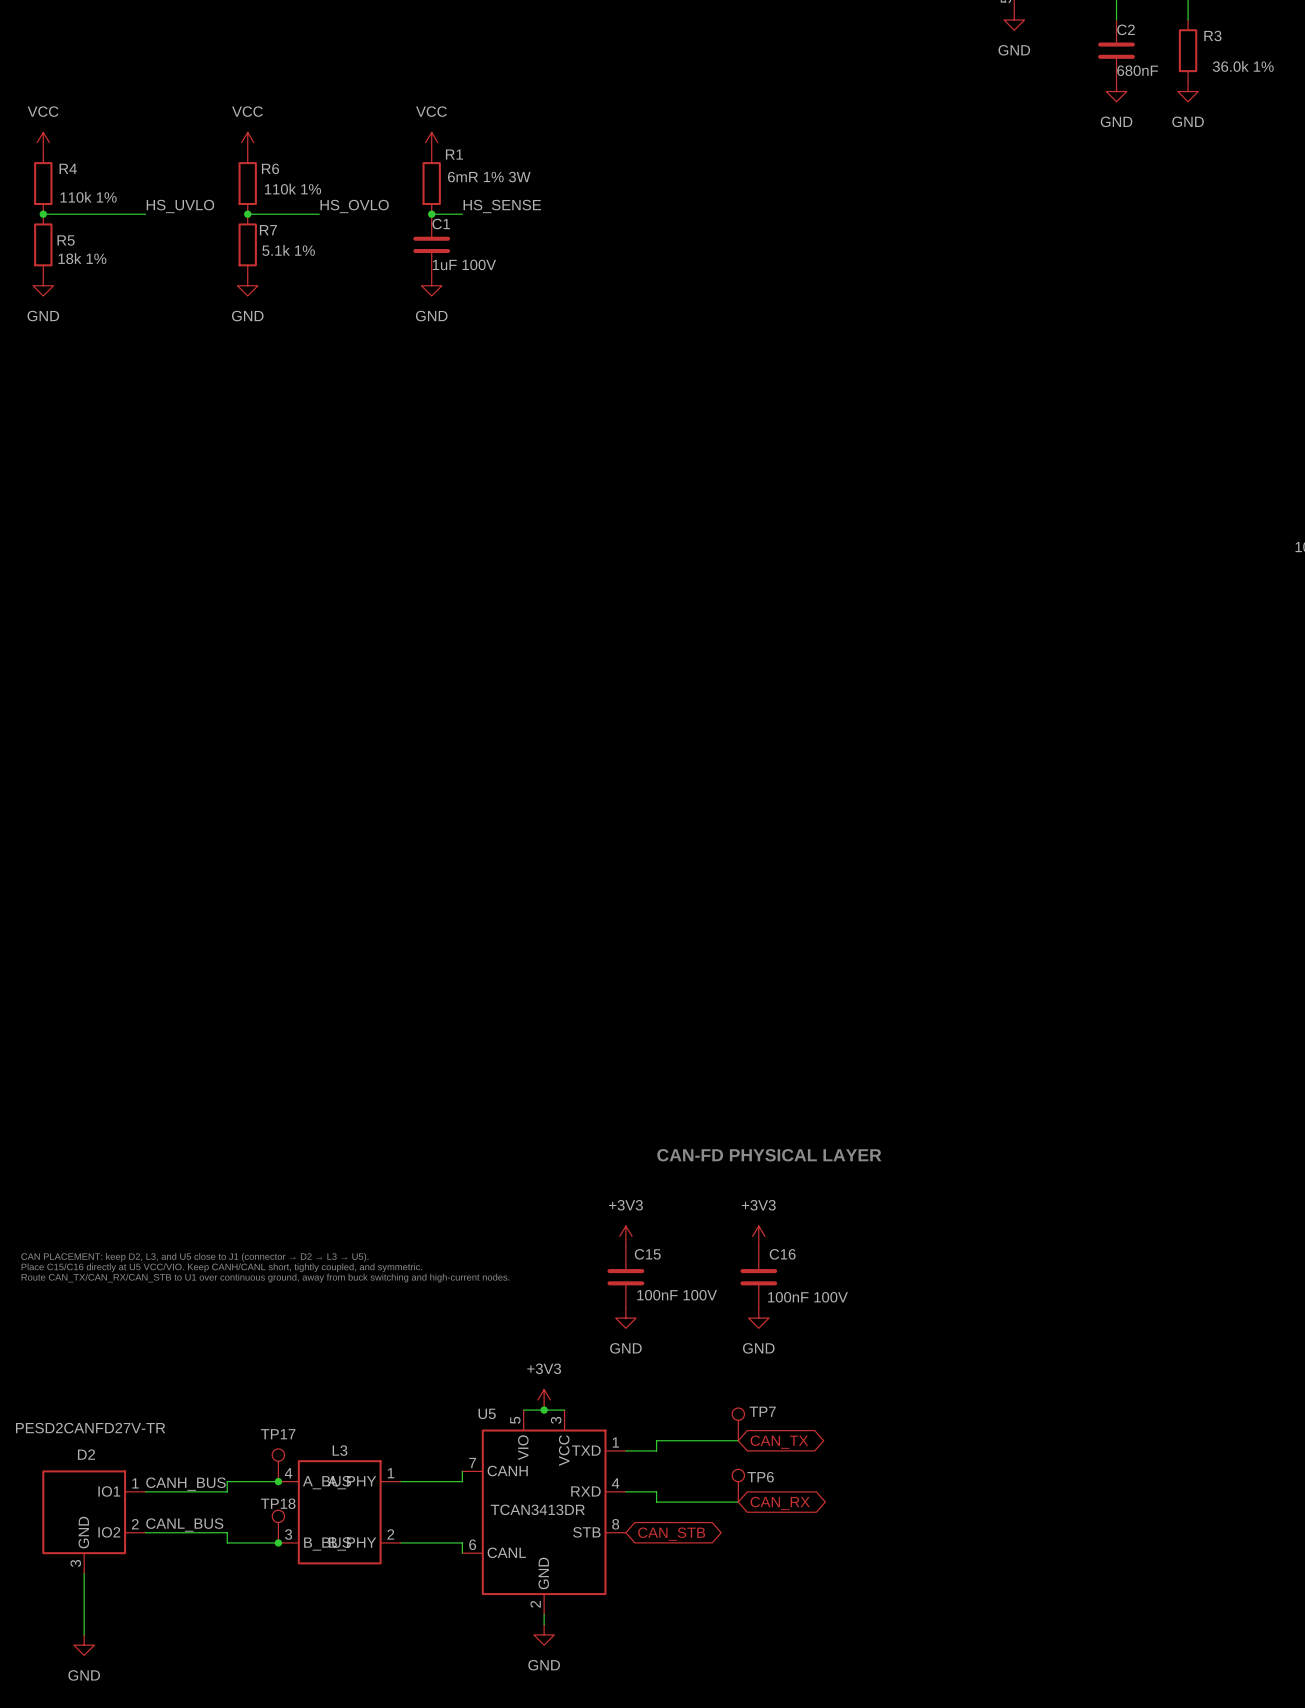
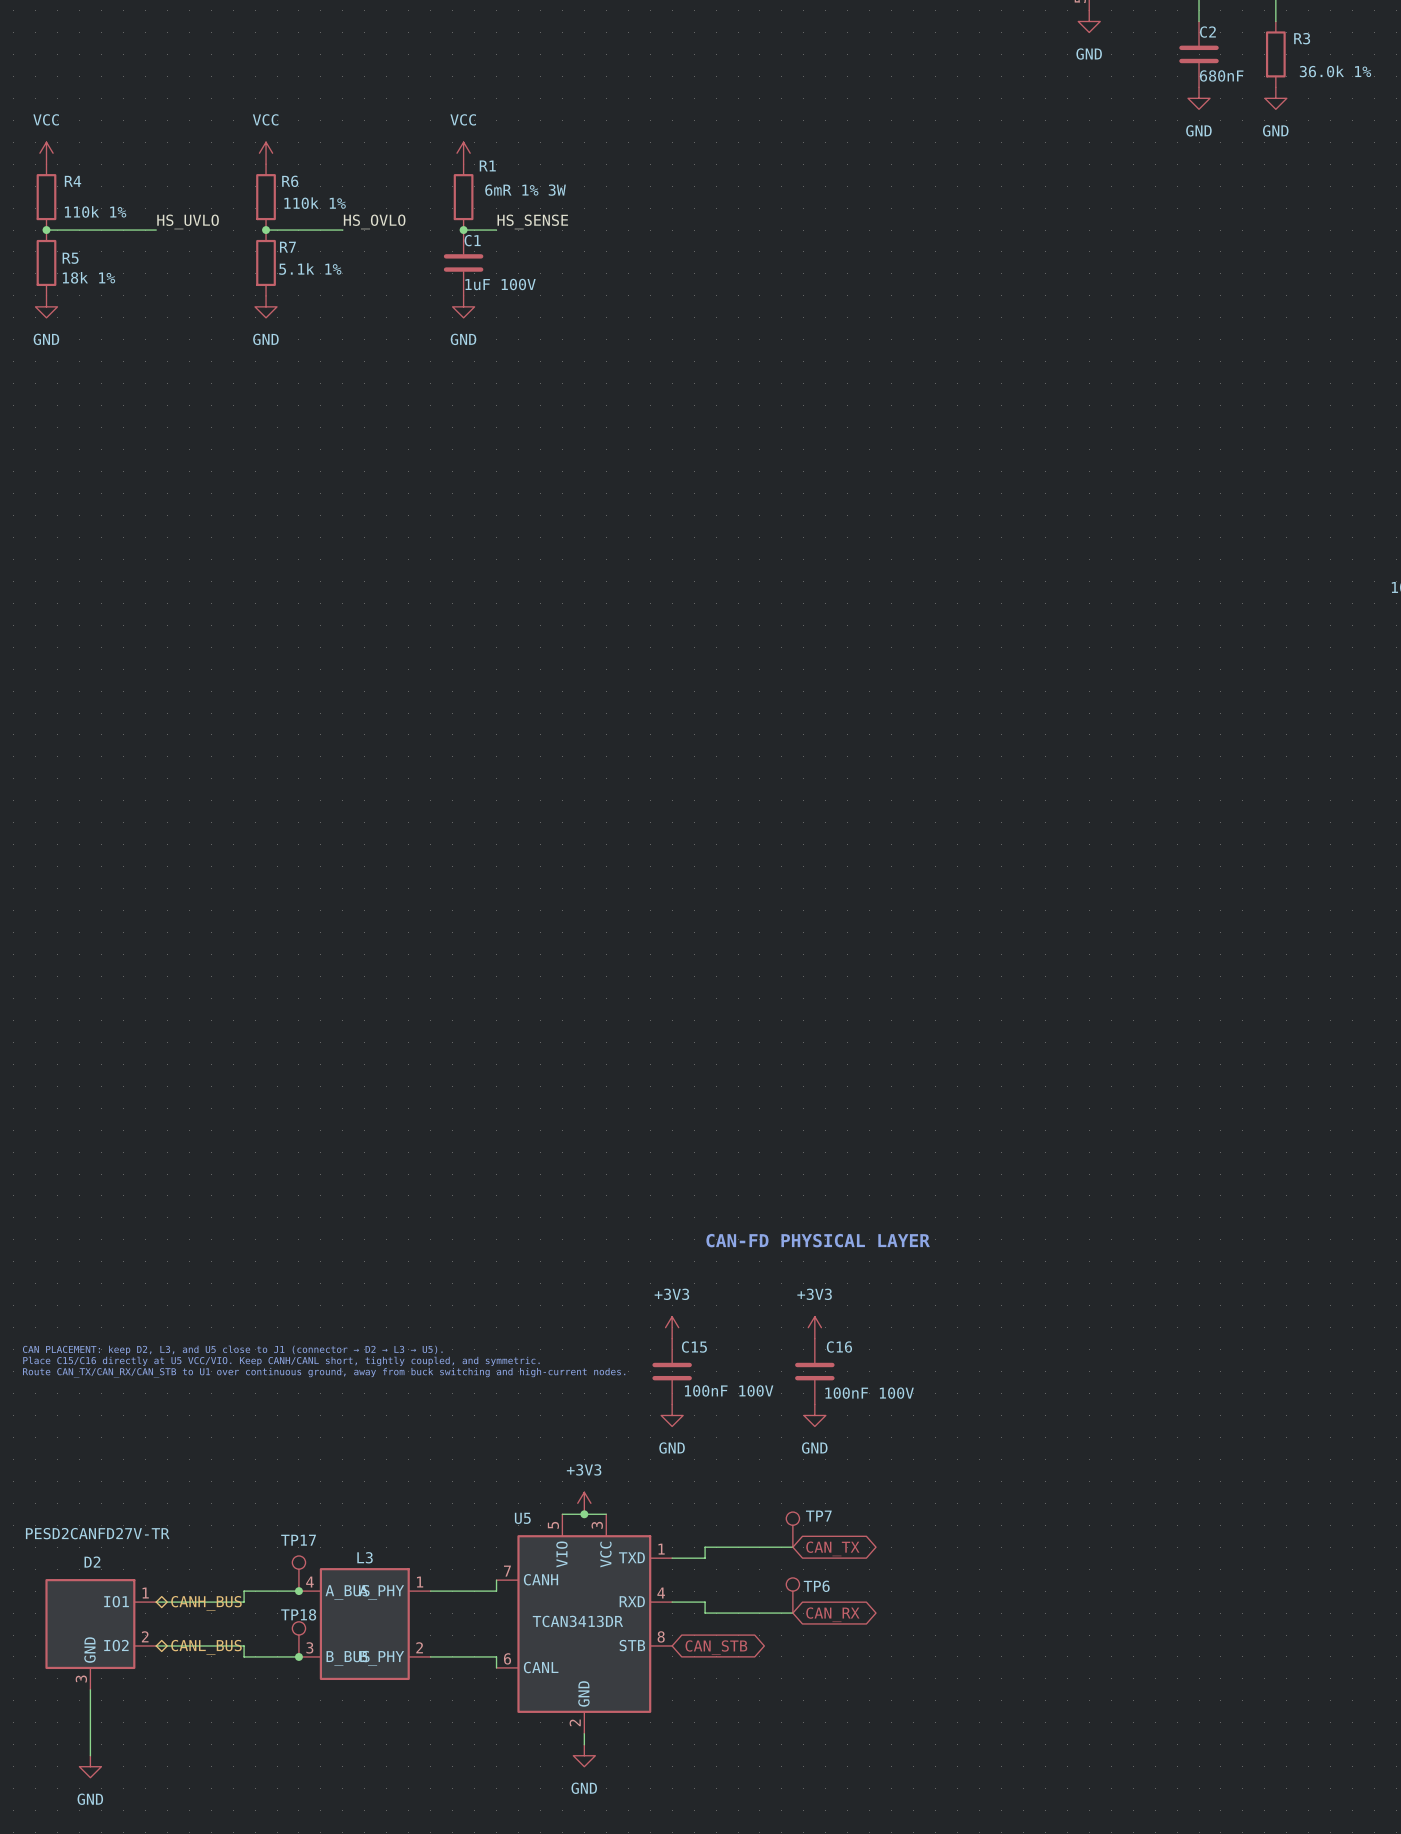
label: CANH_BUS (186, 1484) -> none
hierarchical label: none -> CANH_BUS (206, 1603)
label: CANL_BUS (184, 1525) -> none
hierarchical label: none -> CANL_BUS (206, 1647)

